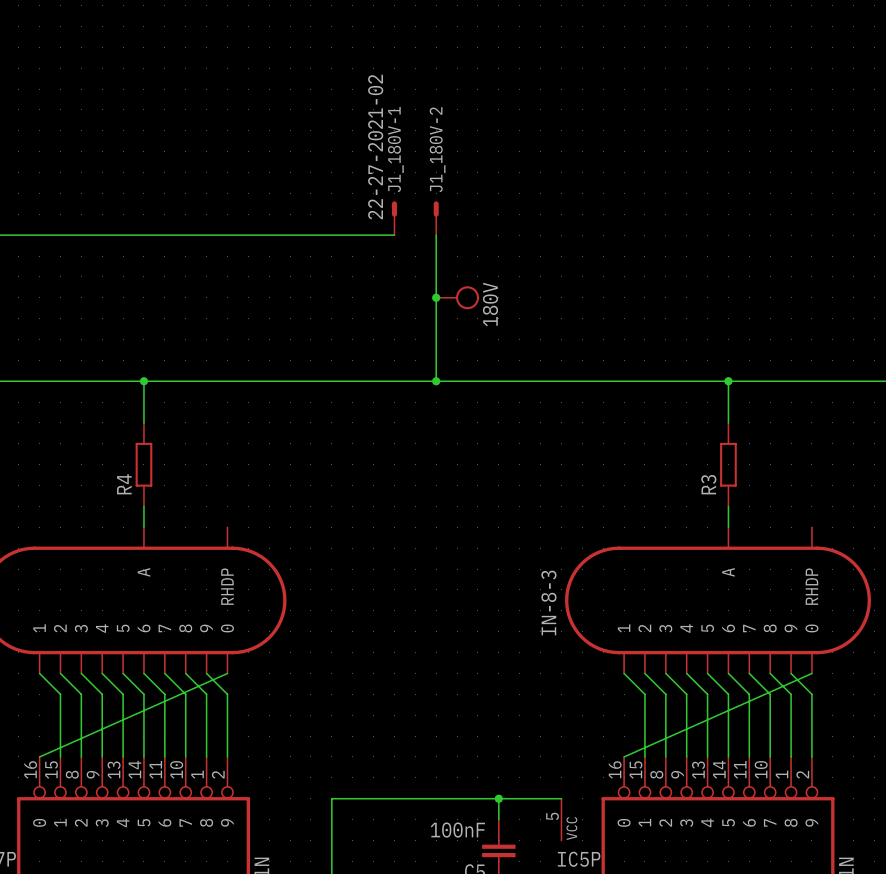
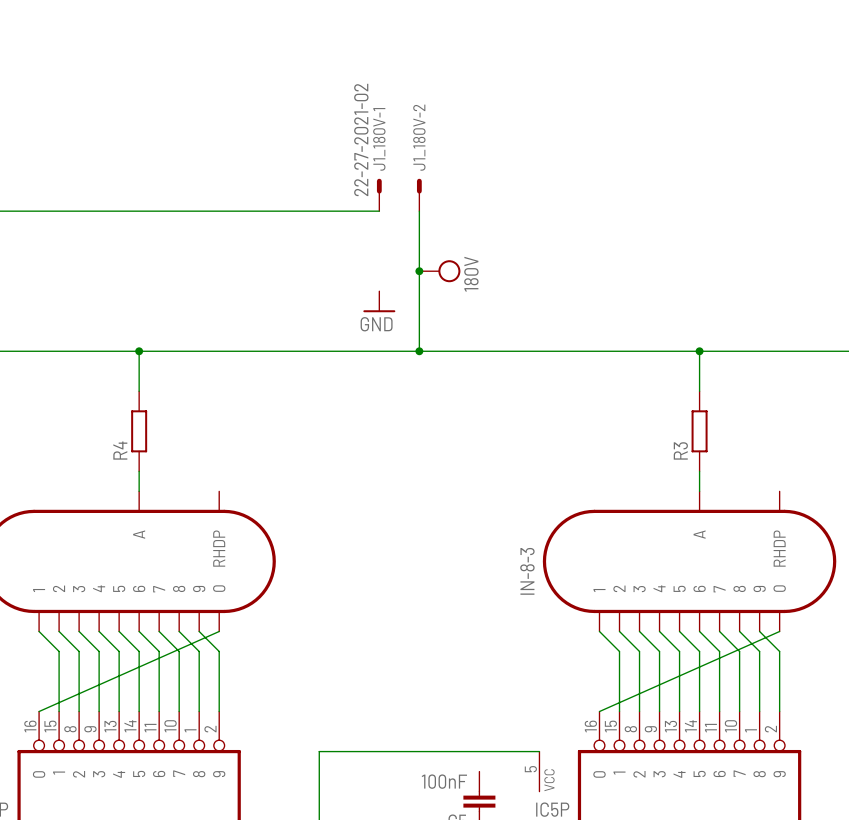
power symbol: none -> GND (379, 301)
wire: (498, 798) (498, 819) -> none
junction: (498, 798) -> none

